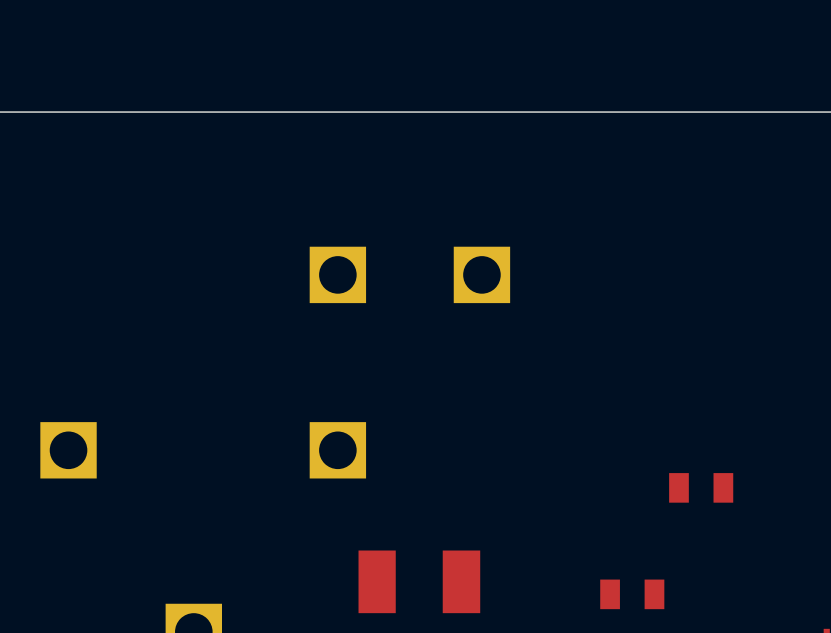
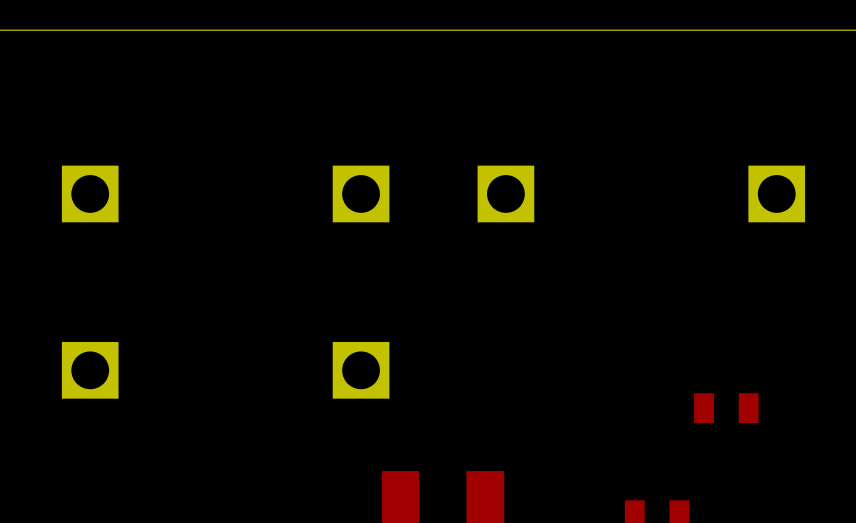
part: none -> (90, 193)
part: none -> (776, 193)

